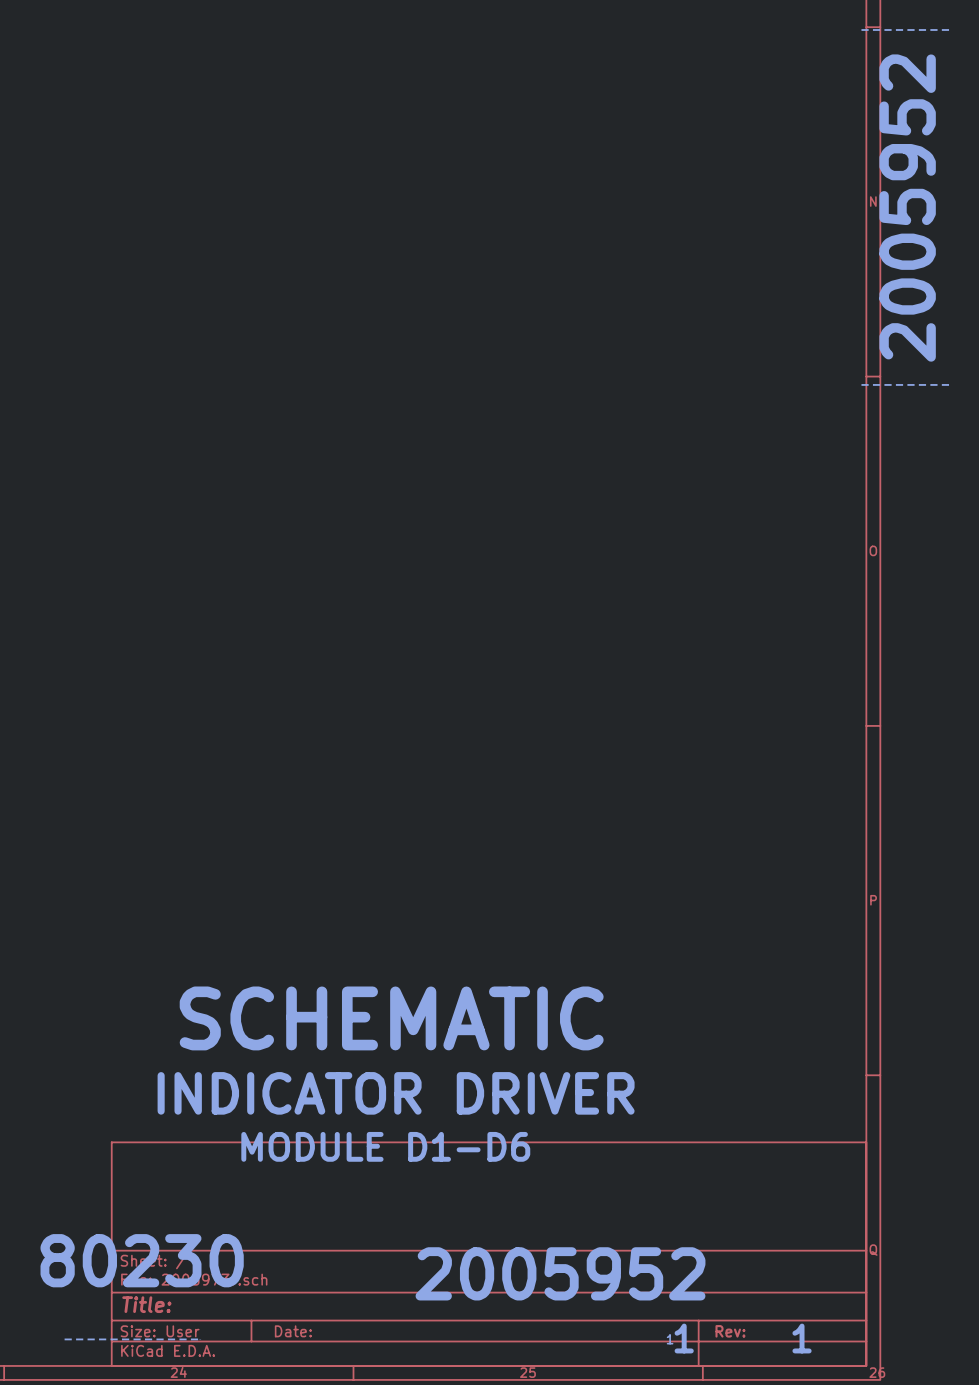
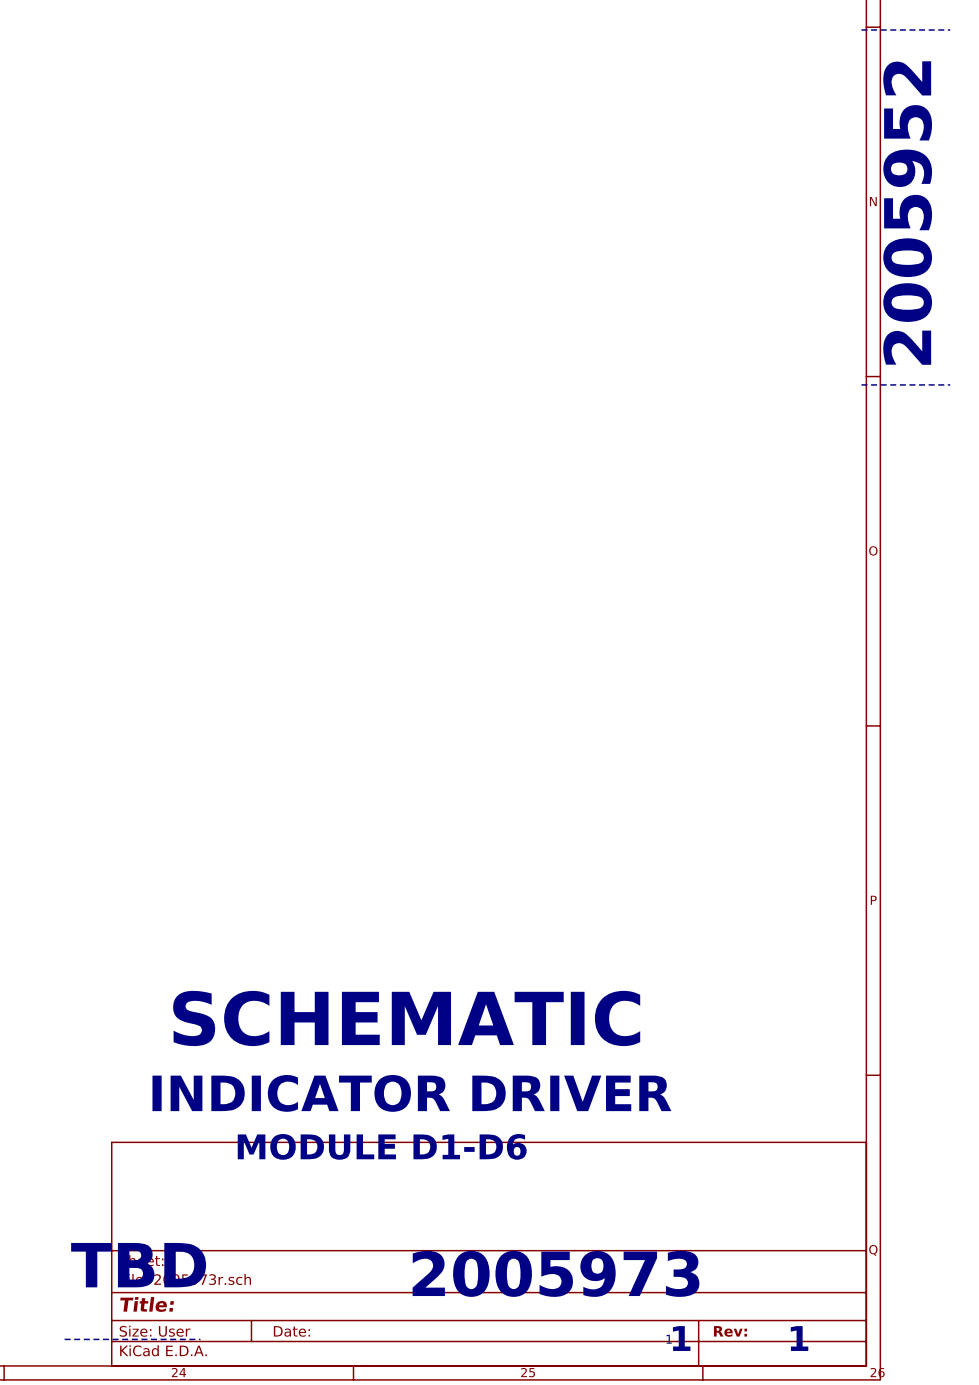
text: 80230 (142, 1260) -> none
text: none -> TBD (138, 1265)
text: 2005952 (560, 1273) -> 2005973 (556, 1273)

